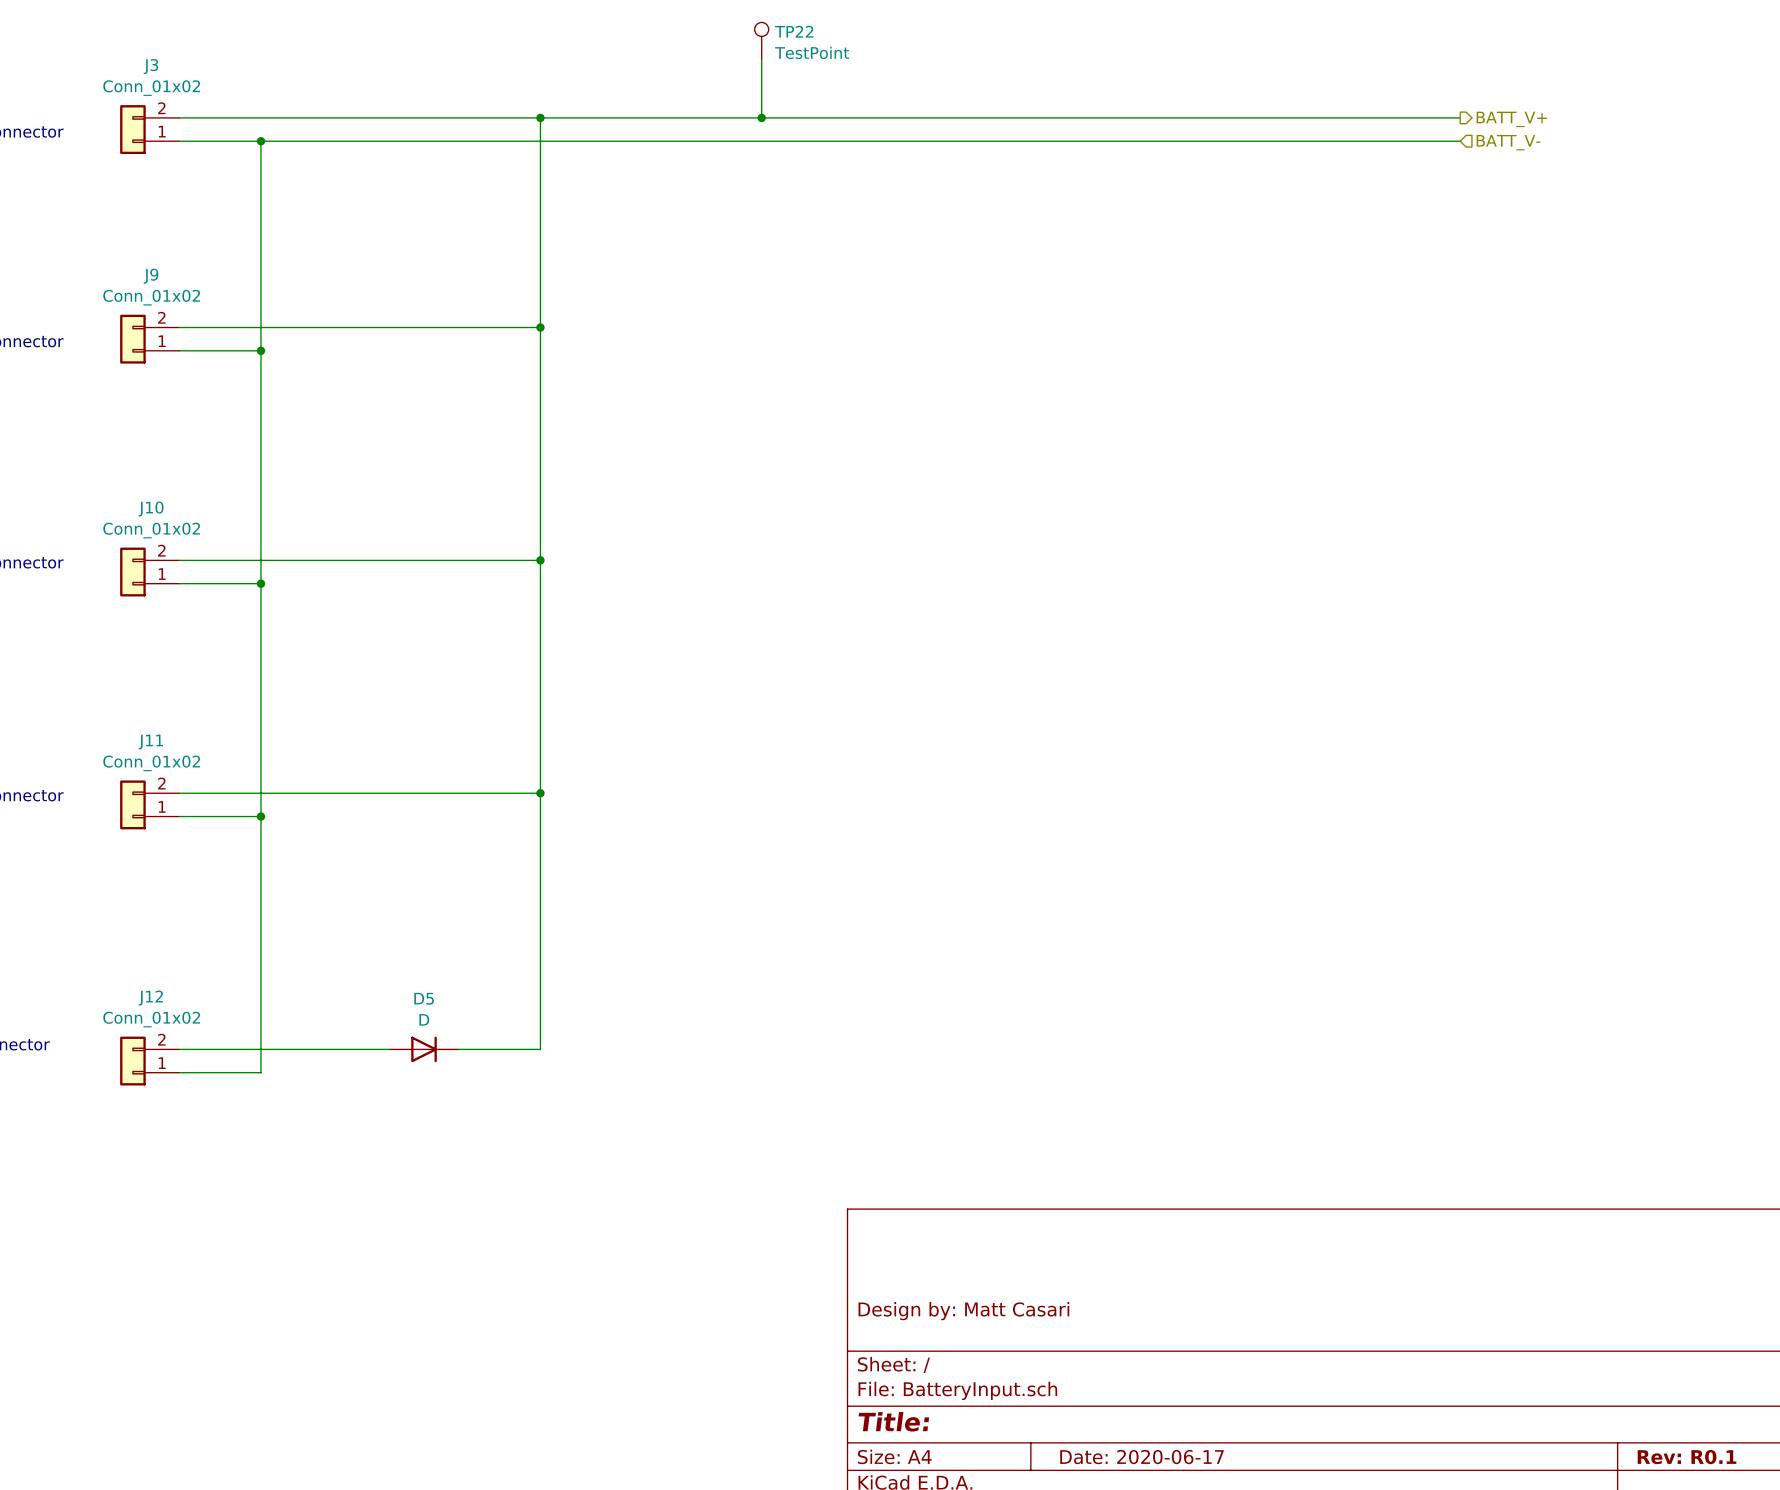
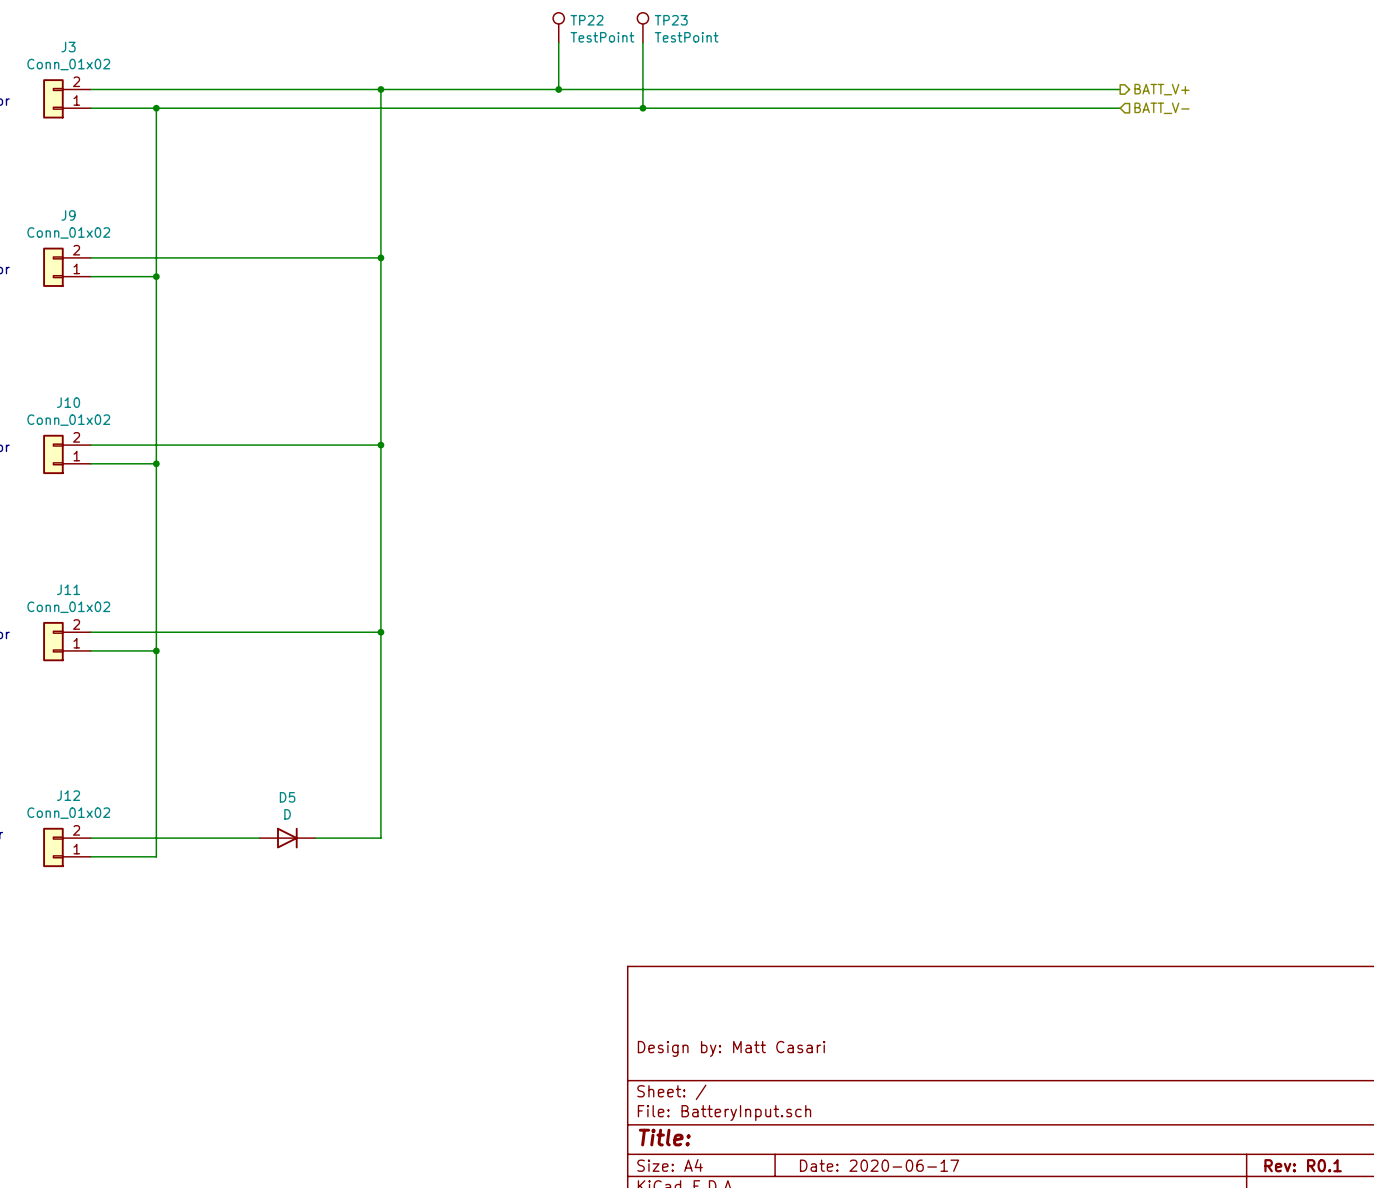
TP23: none -> TestPoint (642, 27)
wire: none -> (642, 42) (642, 108)
junction: none -> (642, 108)

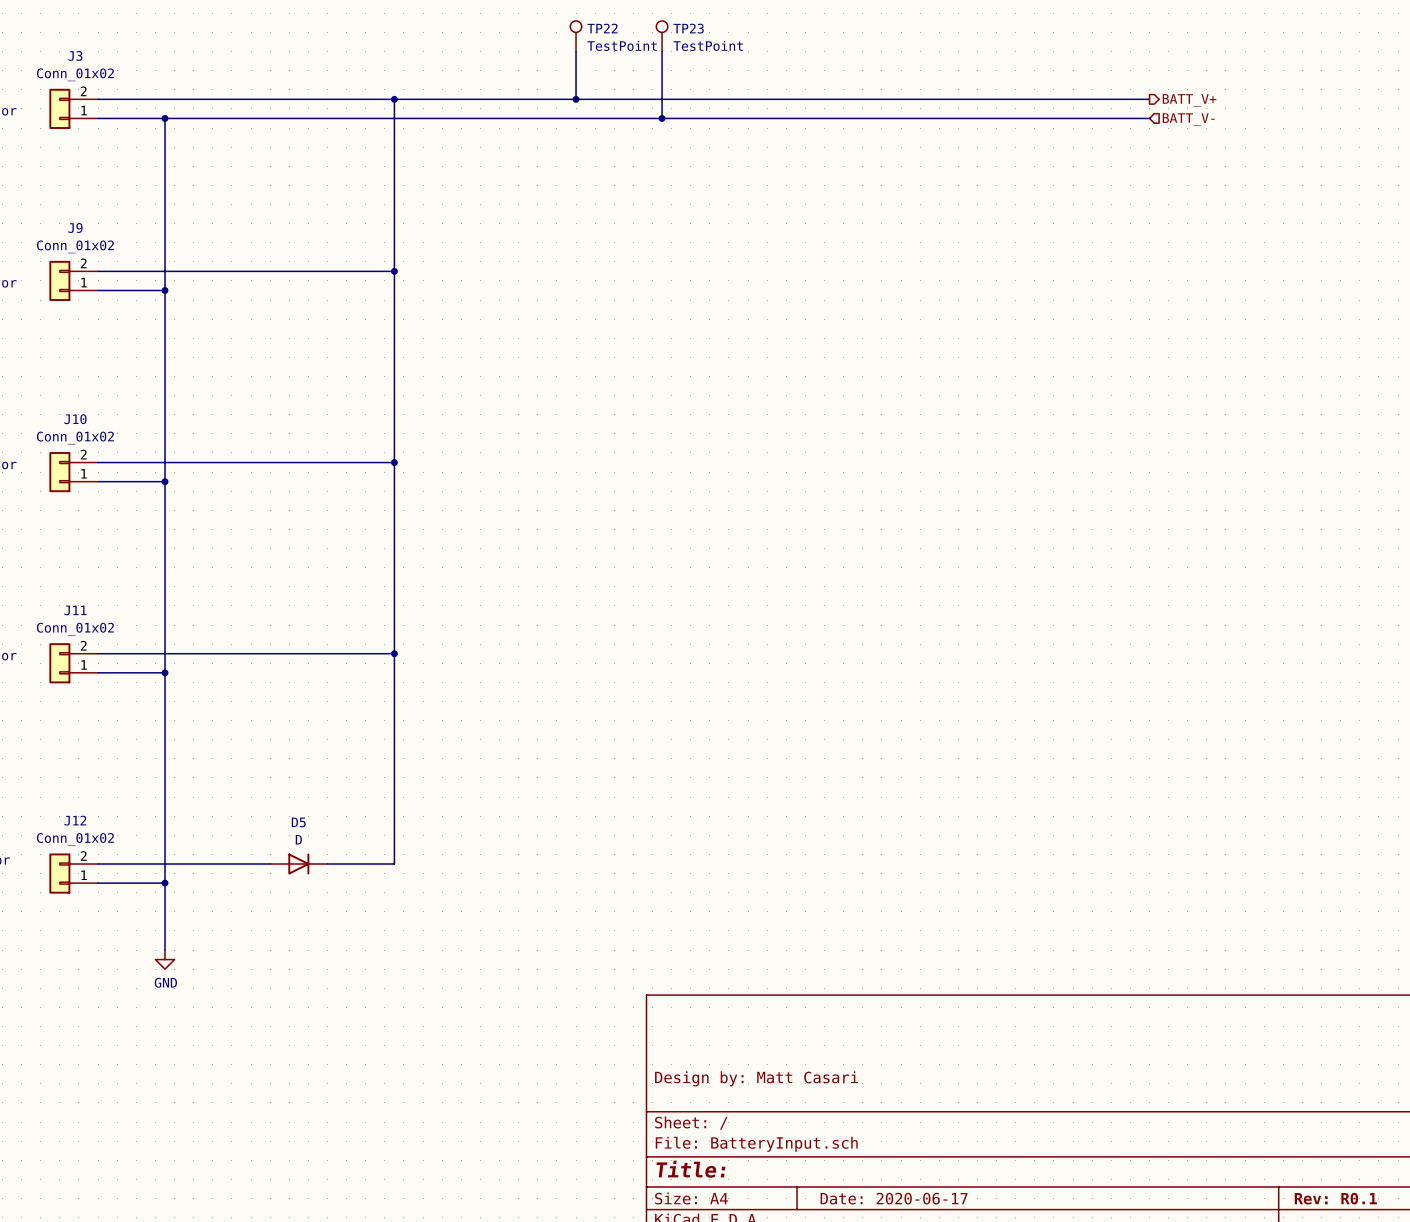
wire: none -> (165, 883) (165, 950)
junction: none -> (165, 883)
power symbol: none -> GND (165, 959)

